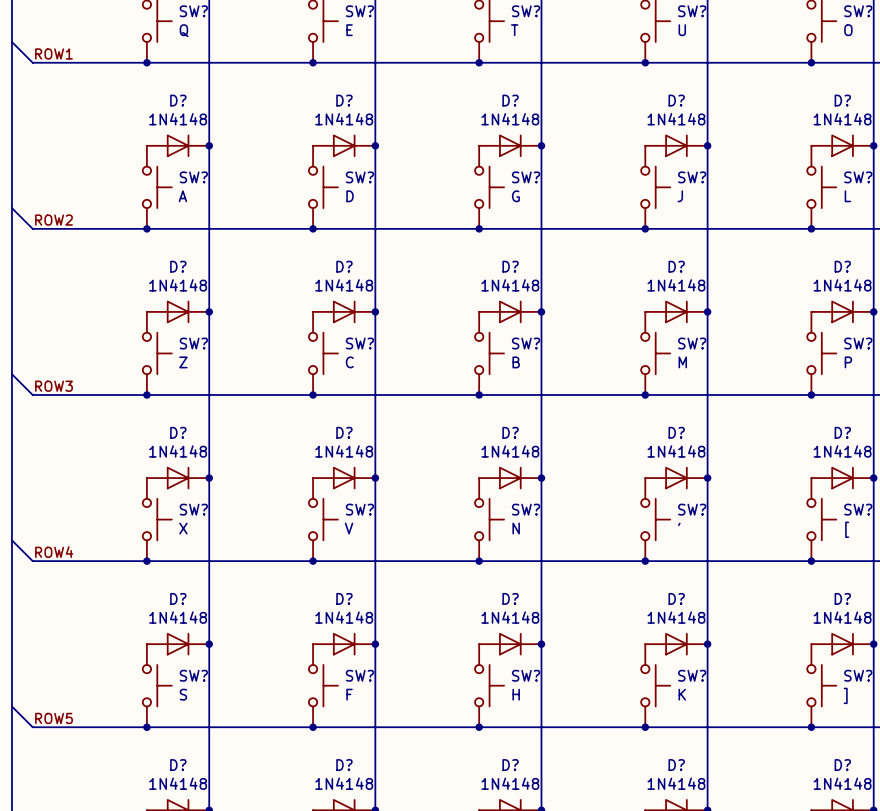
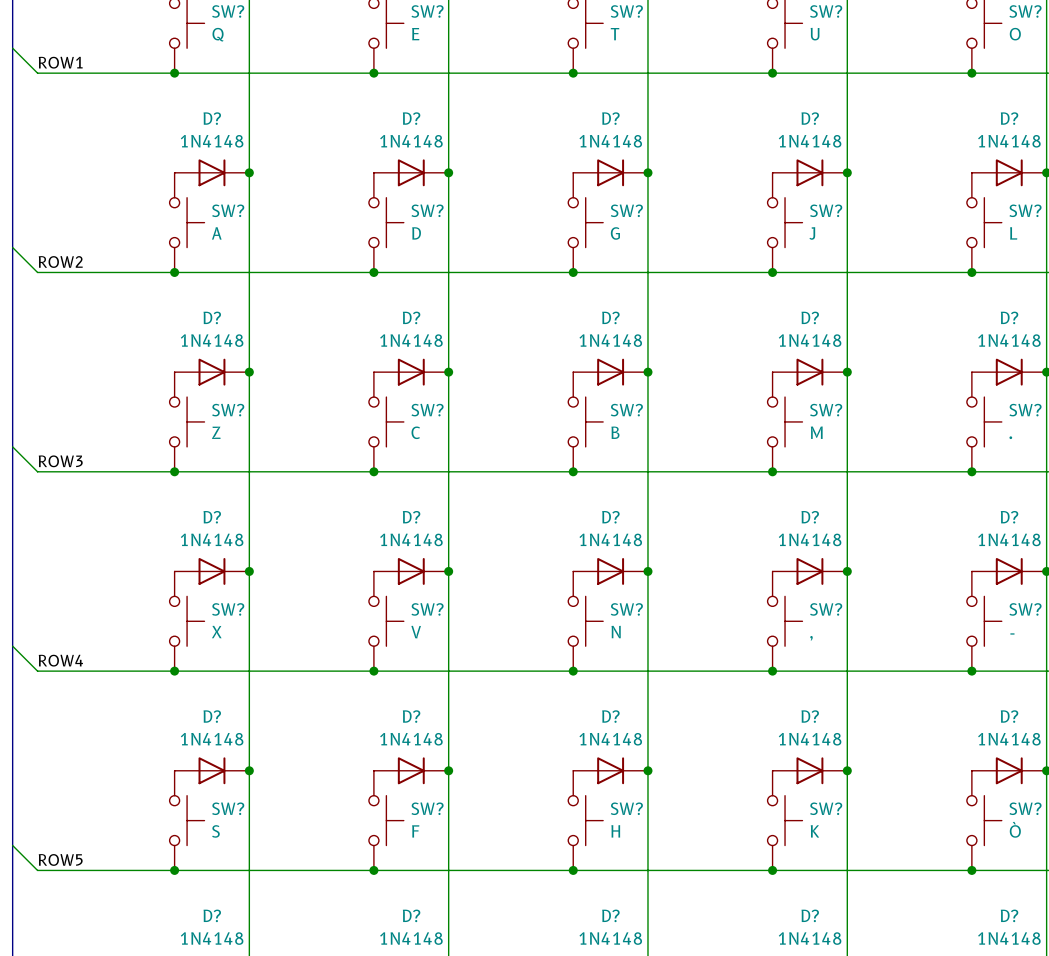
SW? value: P (848, 362) -> . (1010, 437)
SW? value: ' (679, 524) -> , (811, 638)
SW? value: [ (847, 529) -> - (1012, 633)
SW? value: ] (845, 695) -> Ò (1015, 829)

